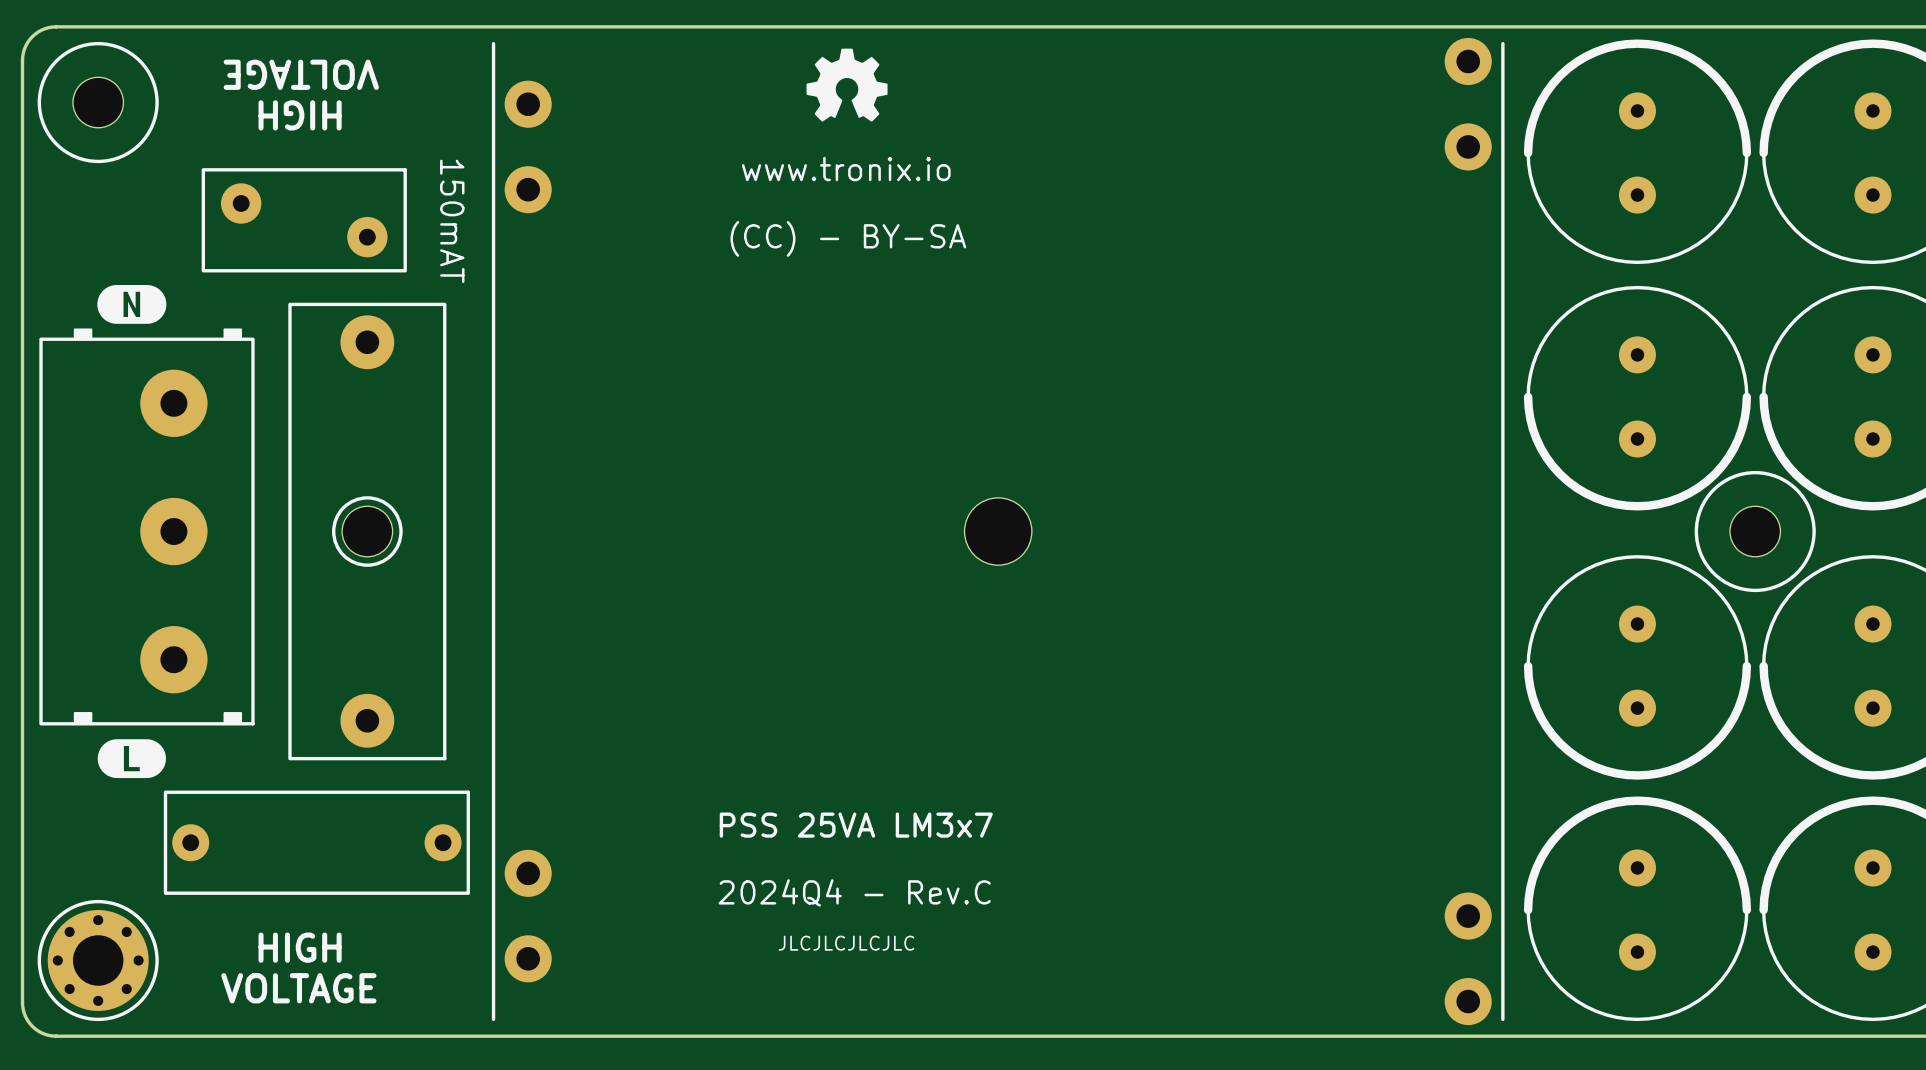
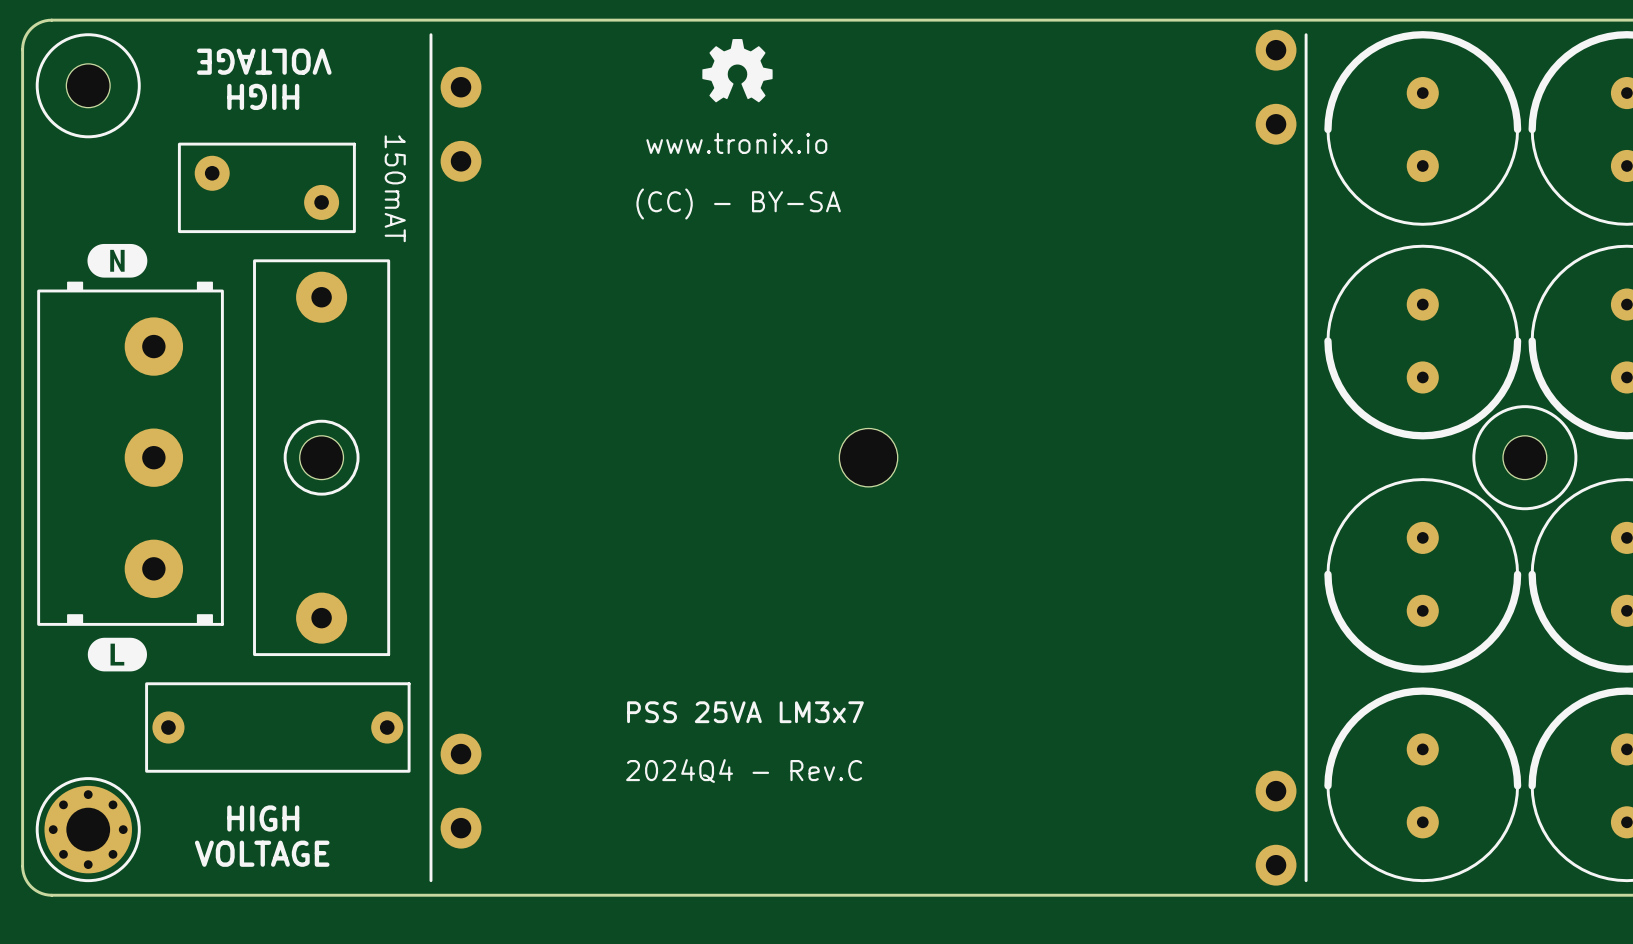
part footprint: [288, 302, 447, 761] -> [253, 259, 391, 657]
text: JLCJLCJLCJLC (846, 943) -> none

